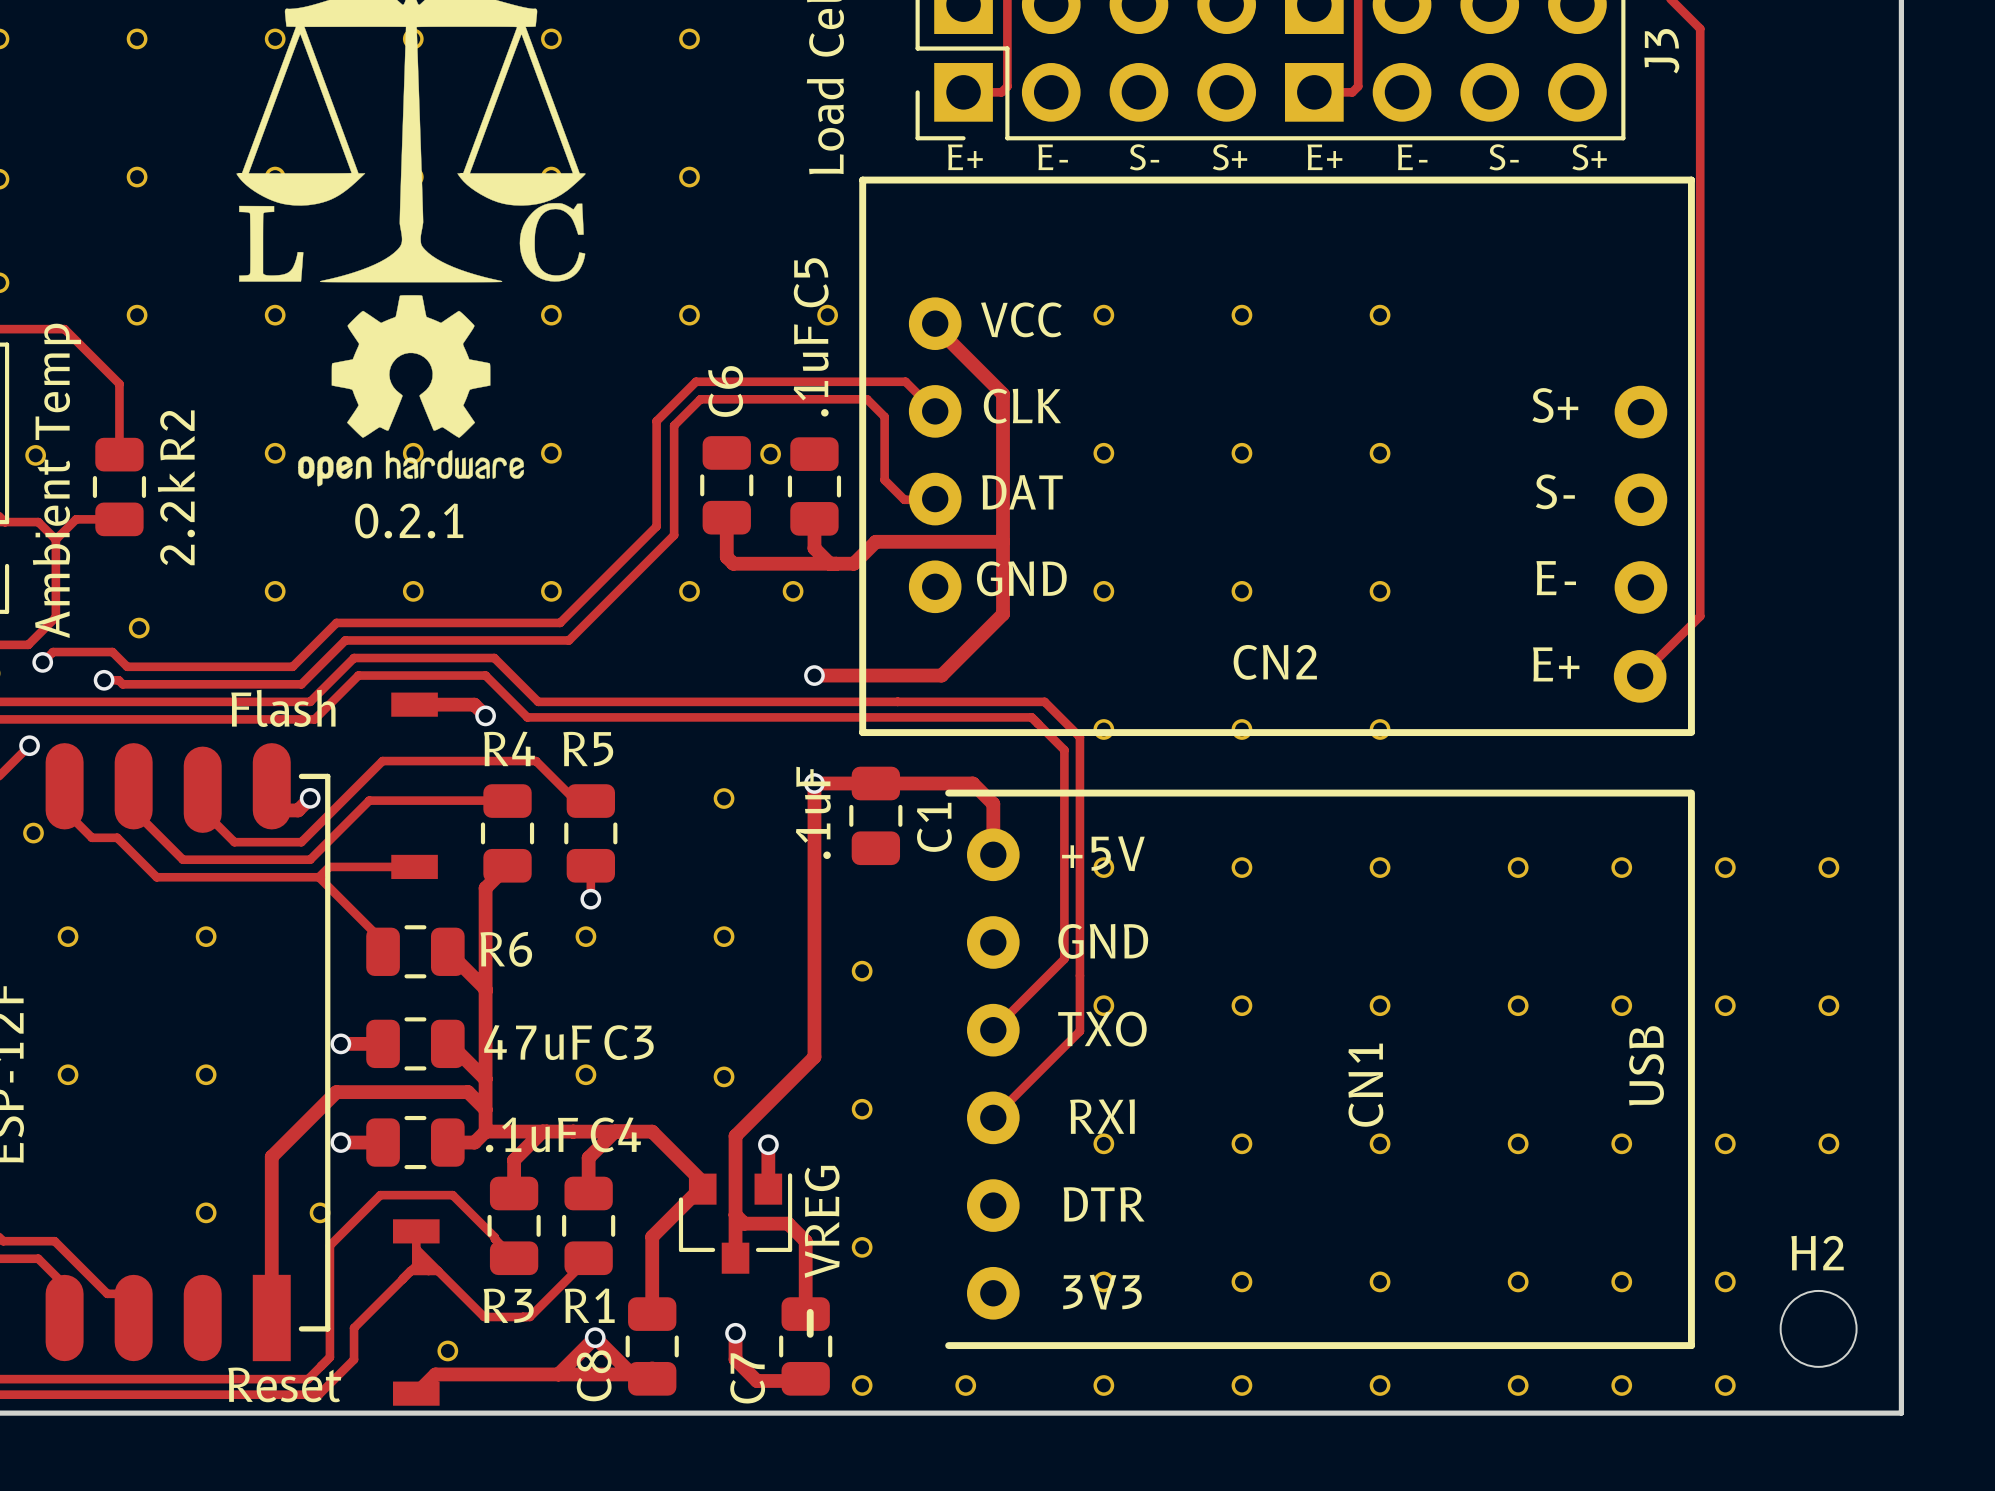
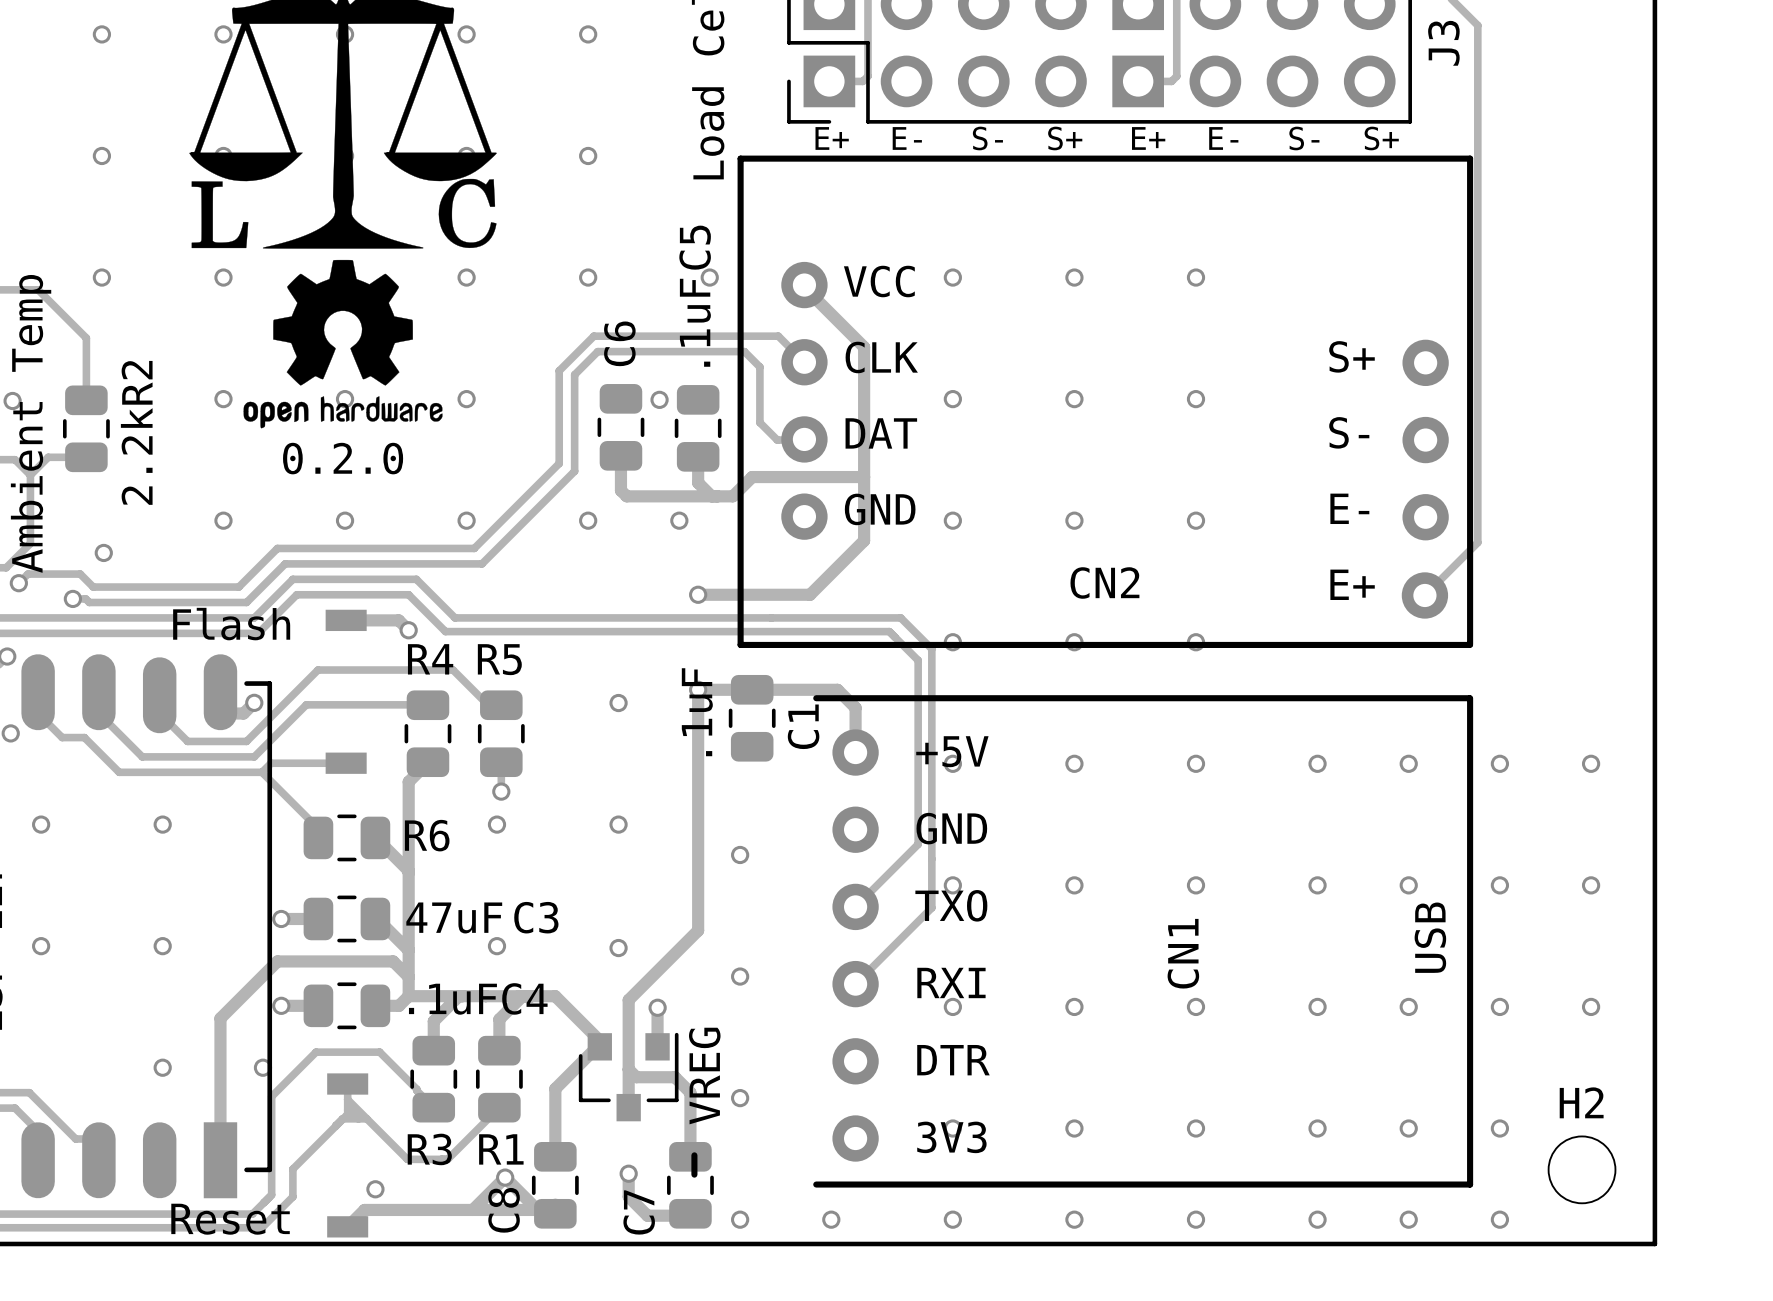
text: 0.2.1 (409, 520) -> 0.2.0 (343, 458)

